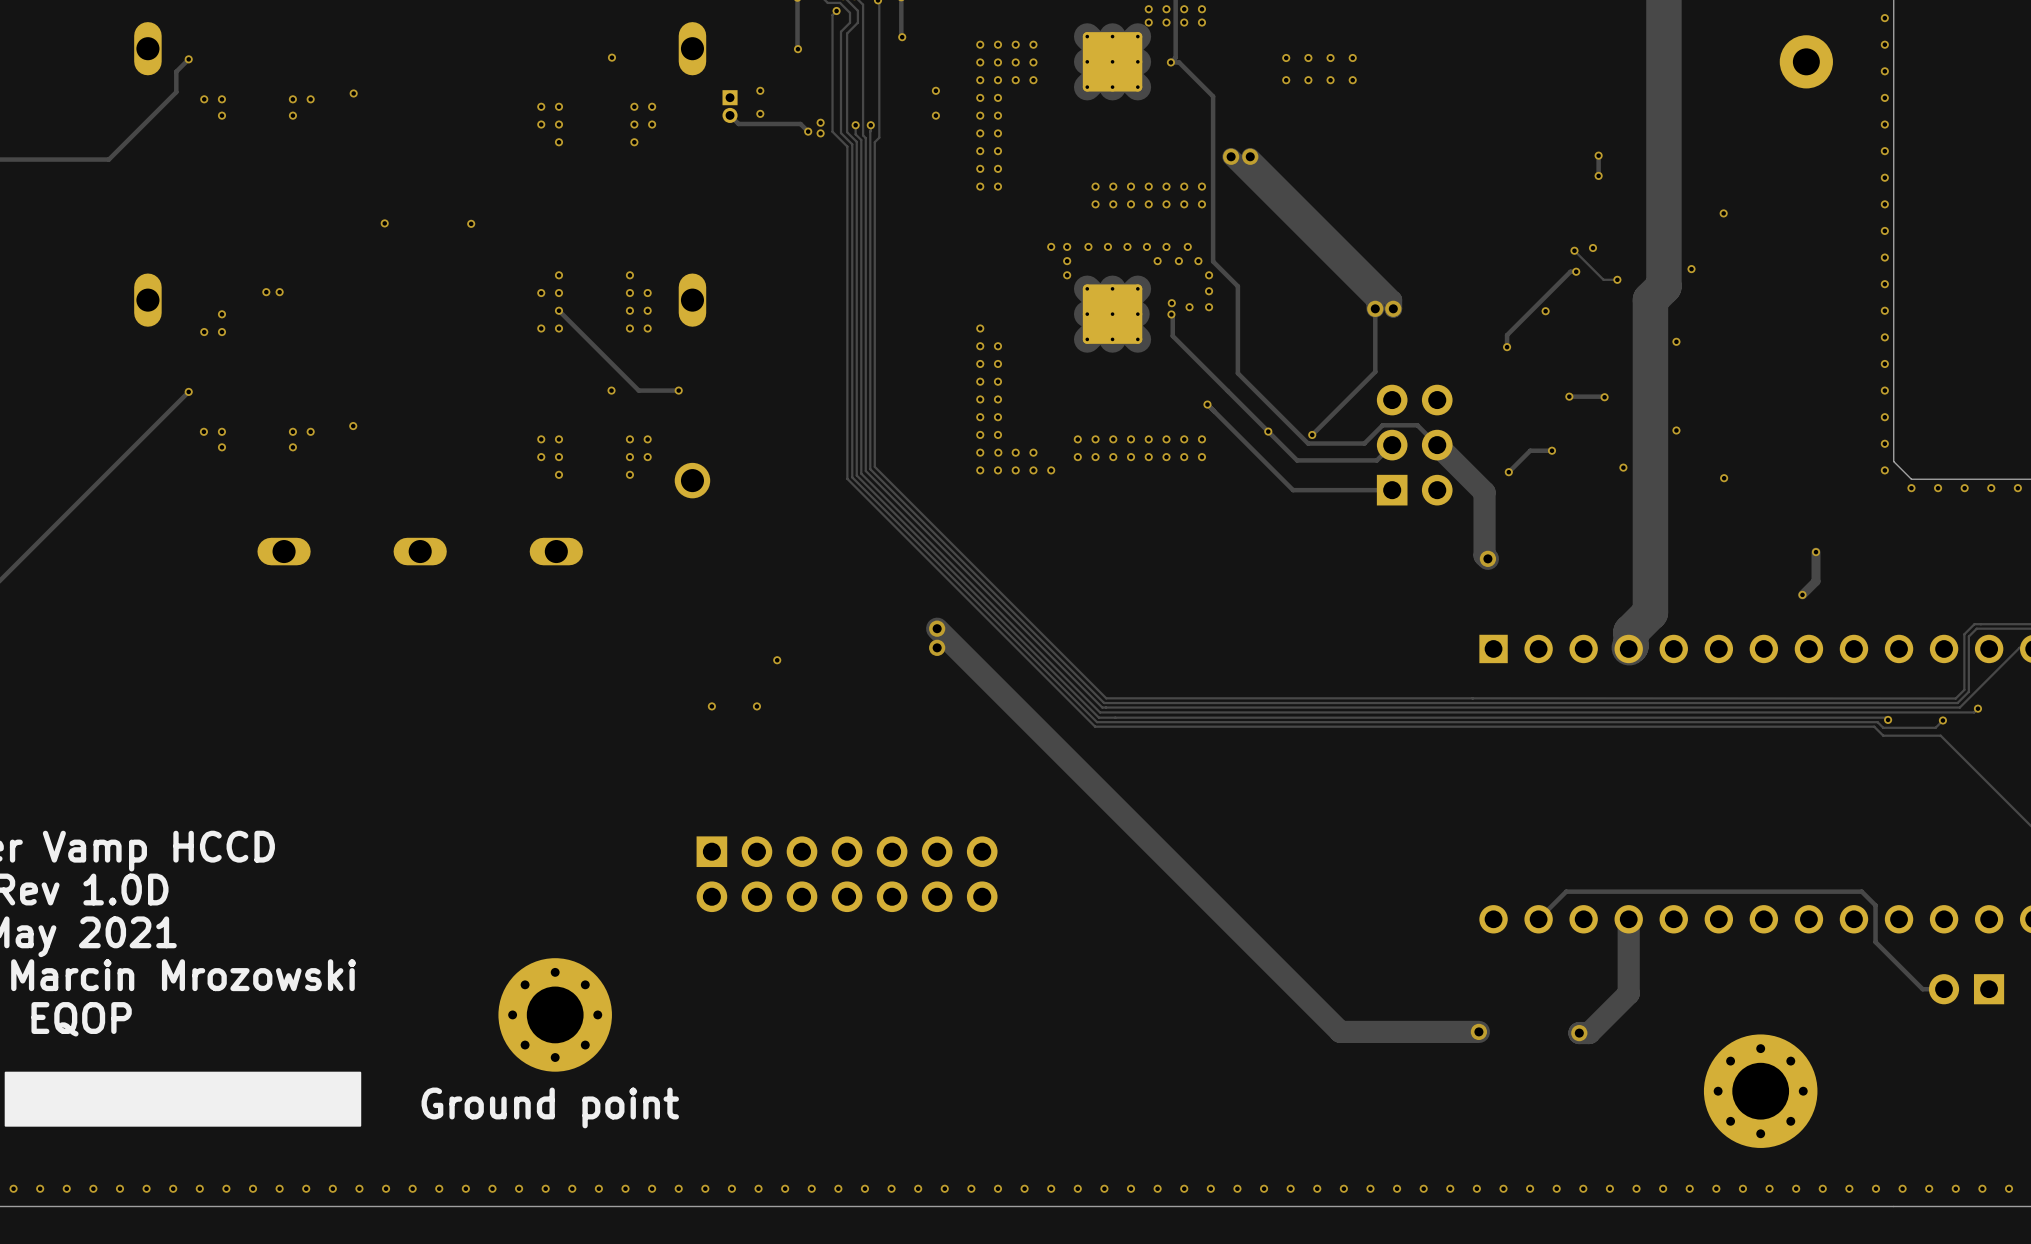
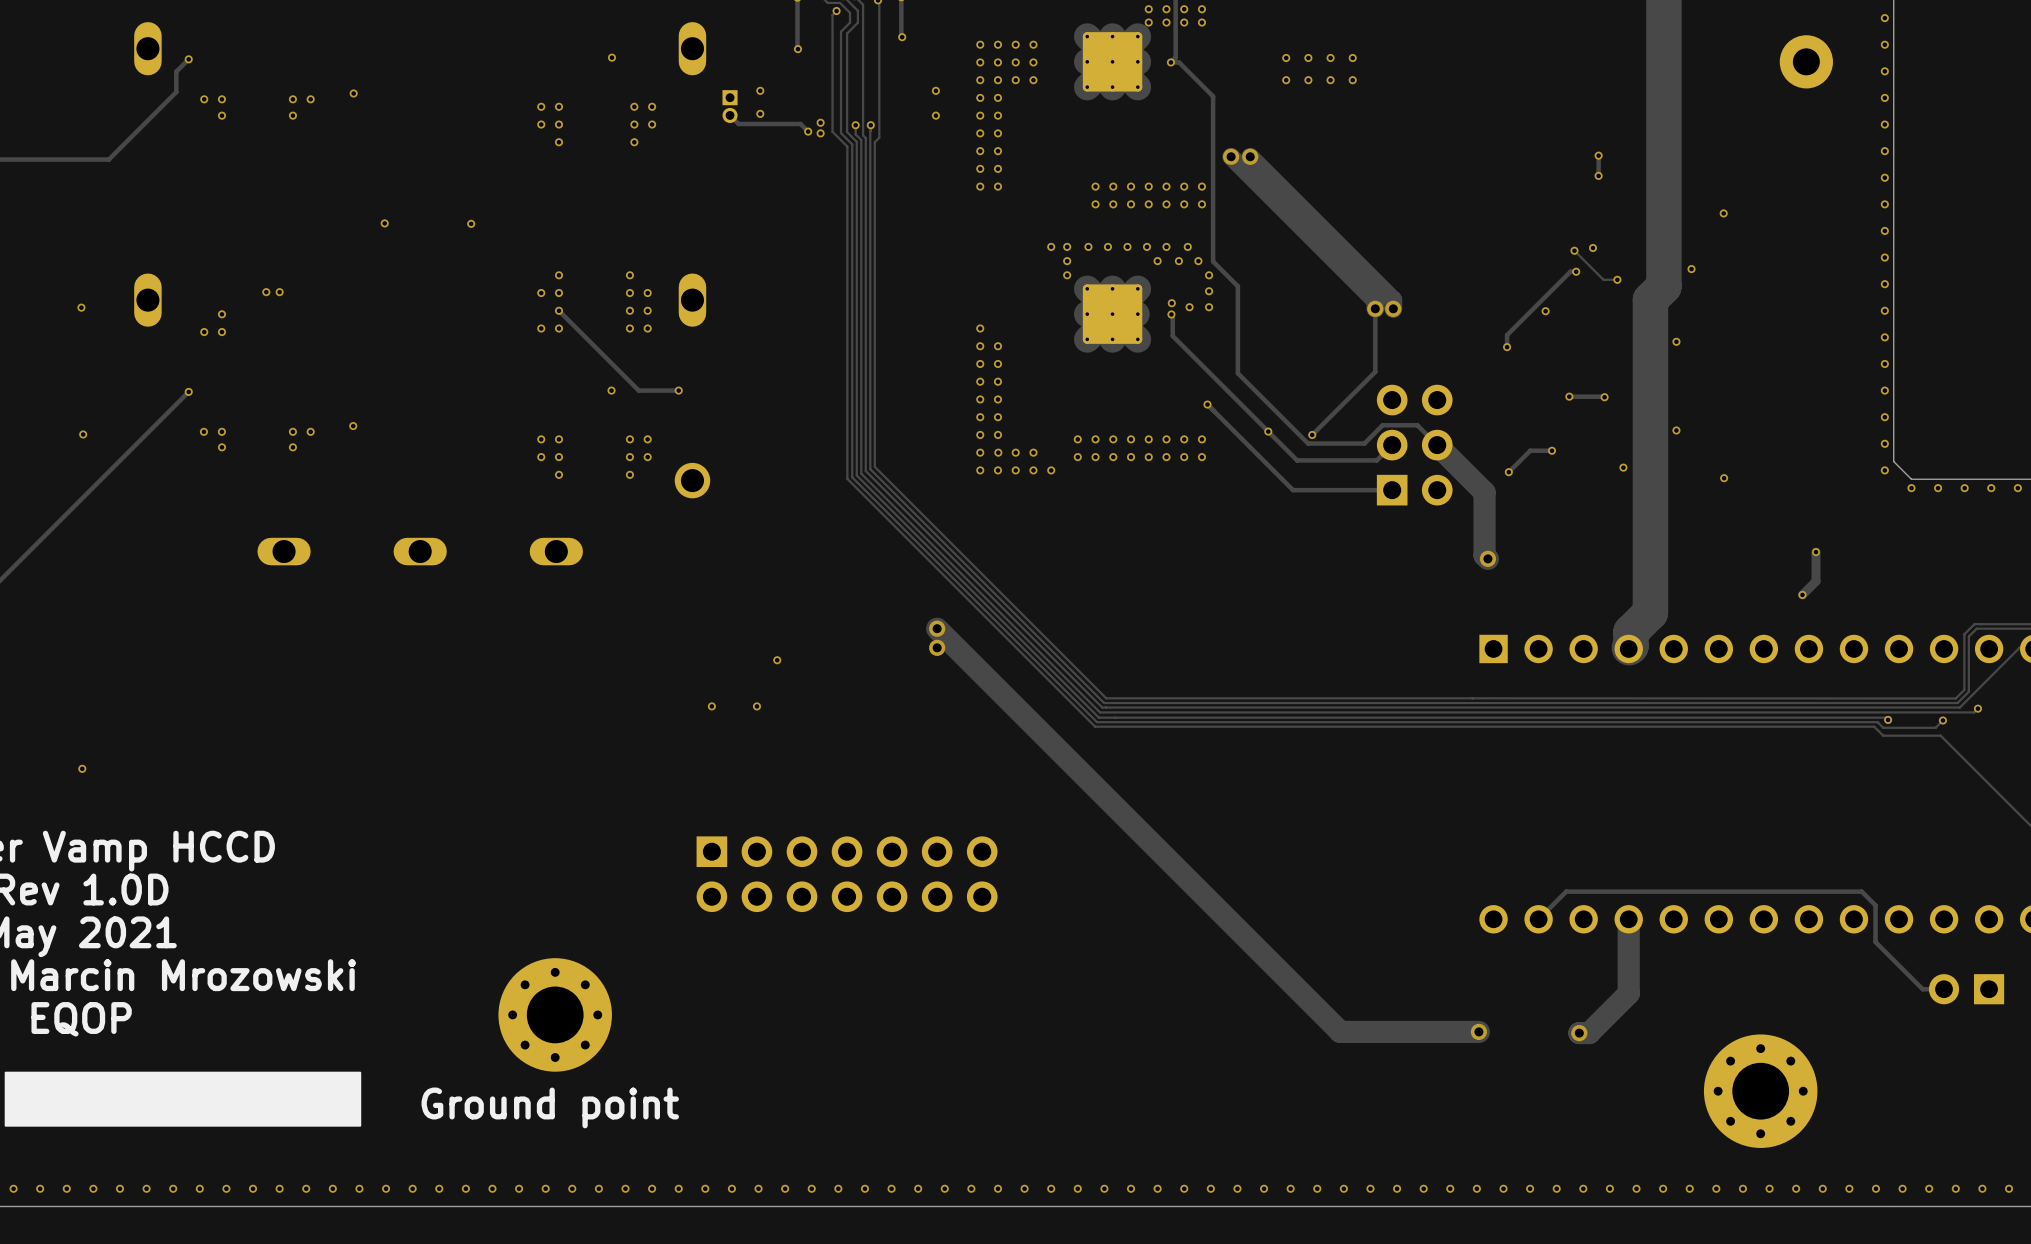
via: none -> (81, 307)
via: none -> (83, 434)
via: none -> (82, 768)

